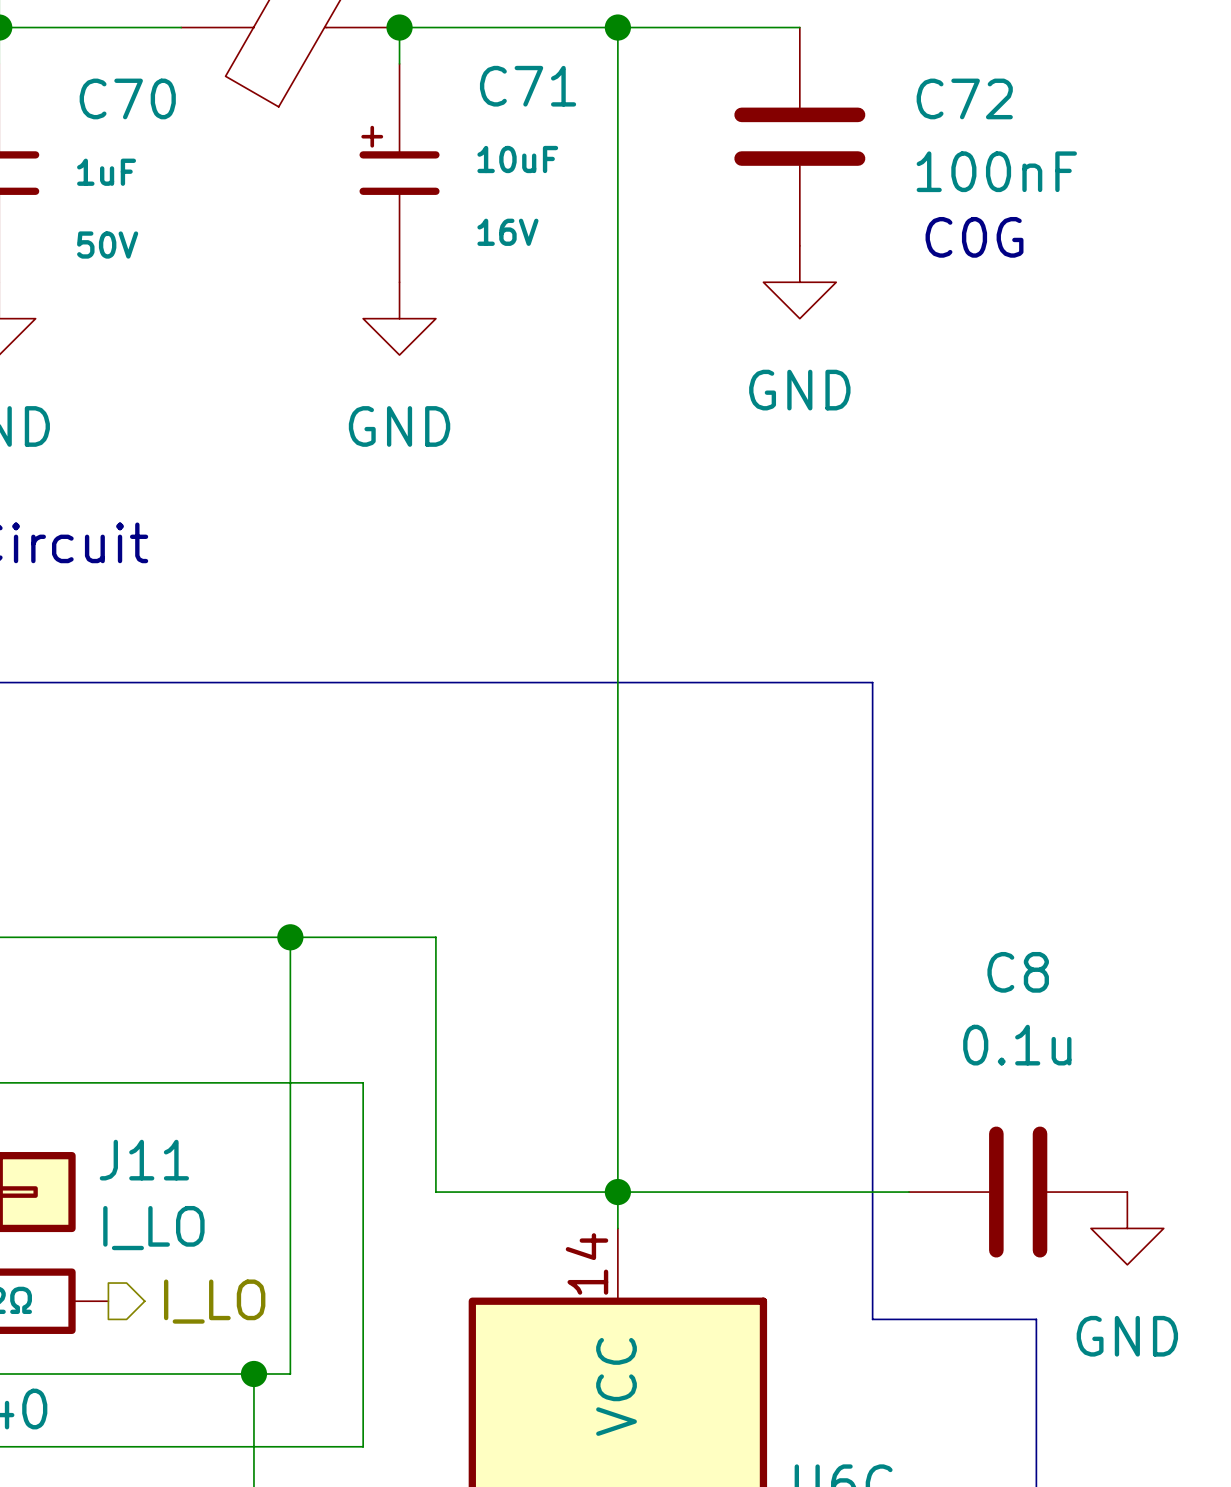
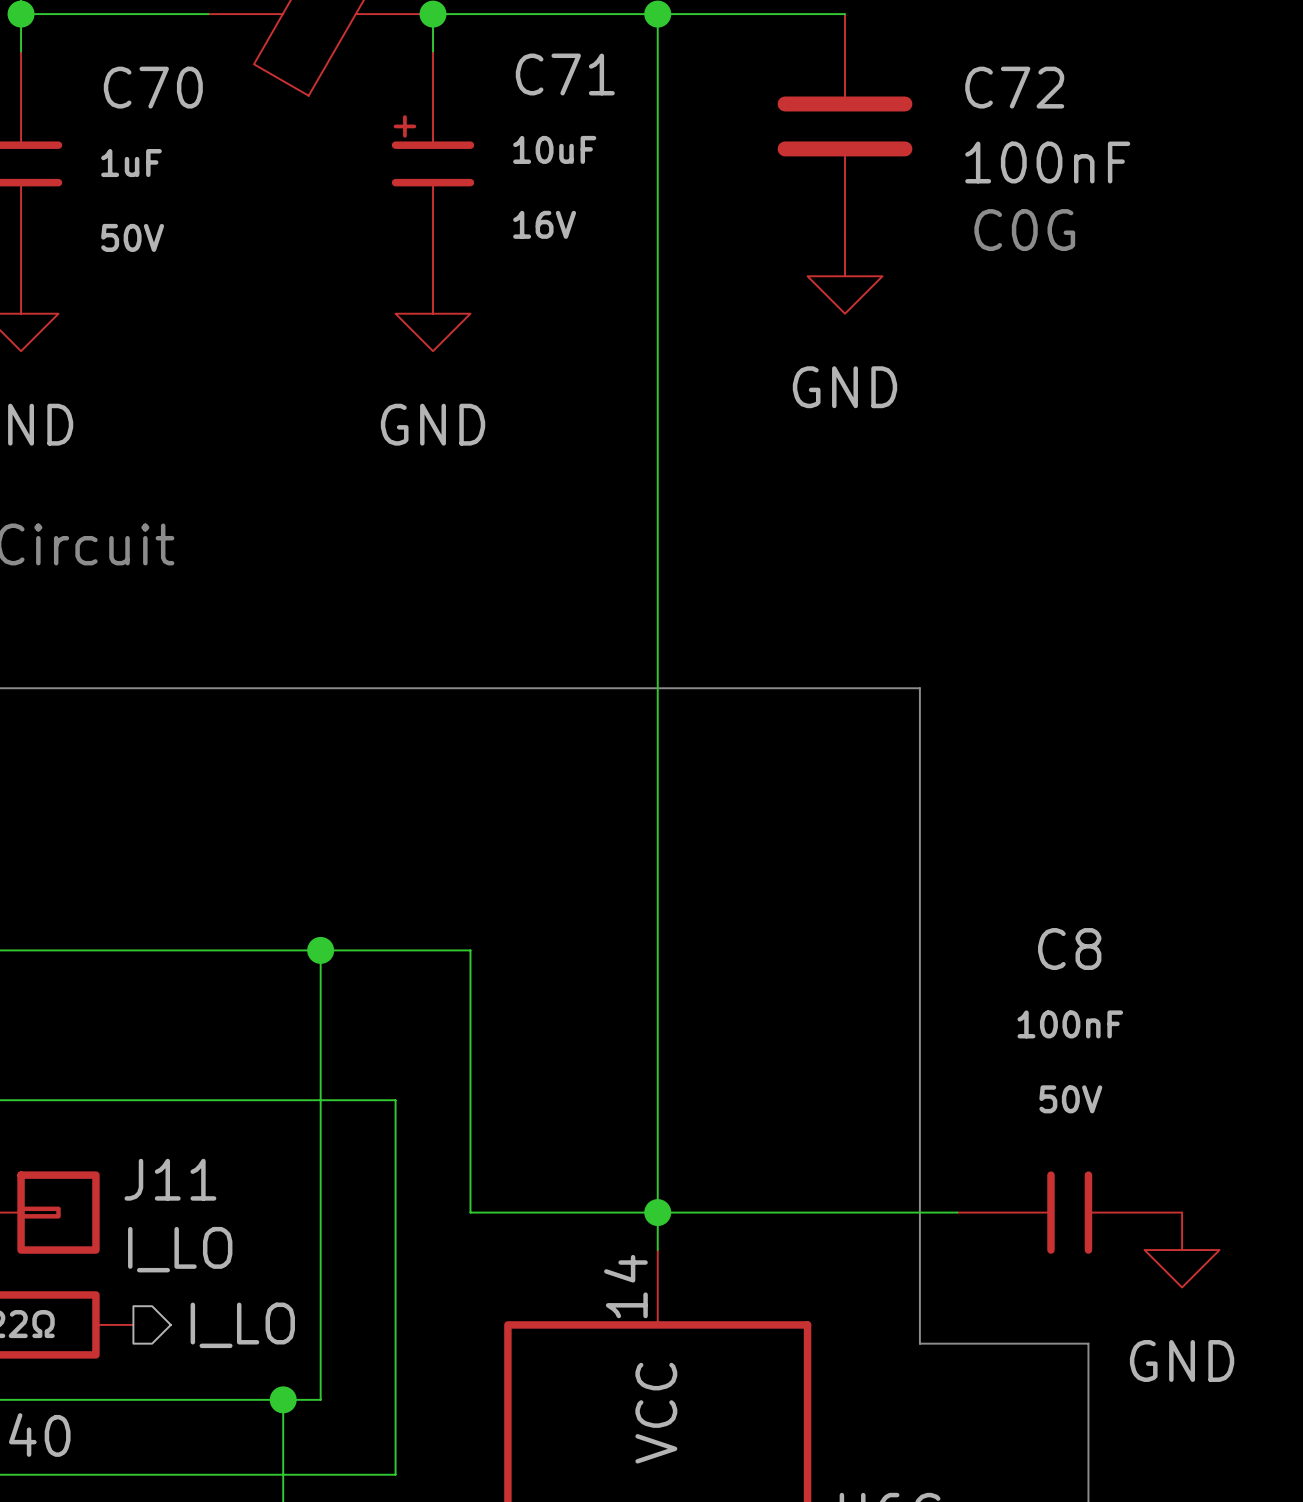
C8 name position: C8 (1018, 972) -> C8 (1069, 949)
C8 value: 0.1u (1017, 1045) -> 100nF (1070, 1024)
C8 text: none -> 50V (1070, 1099)
C8 symbol: [909, 1126, 1128, 1258] -> [957, 1171, 1183, 1254]

